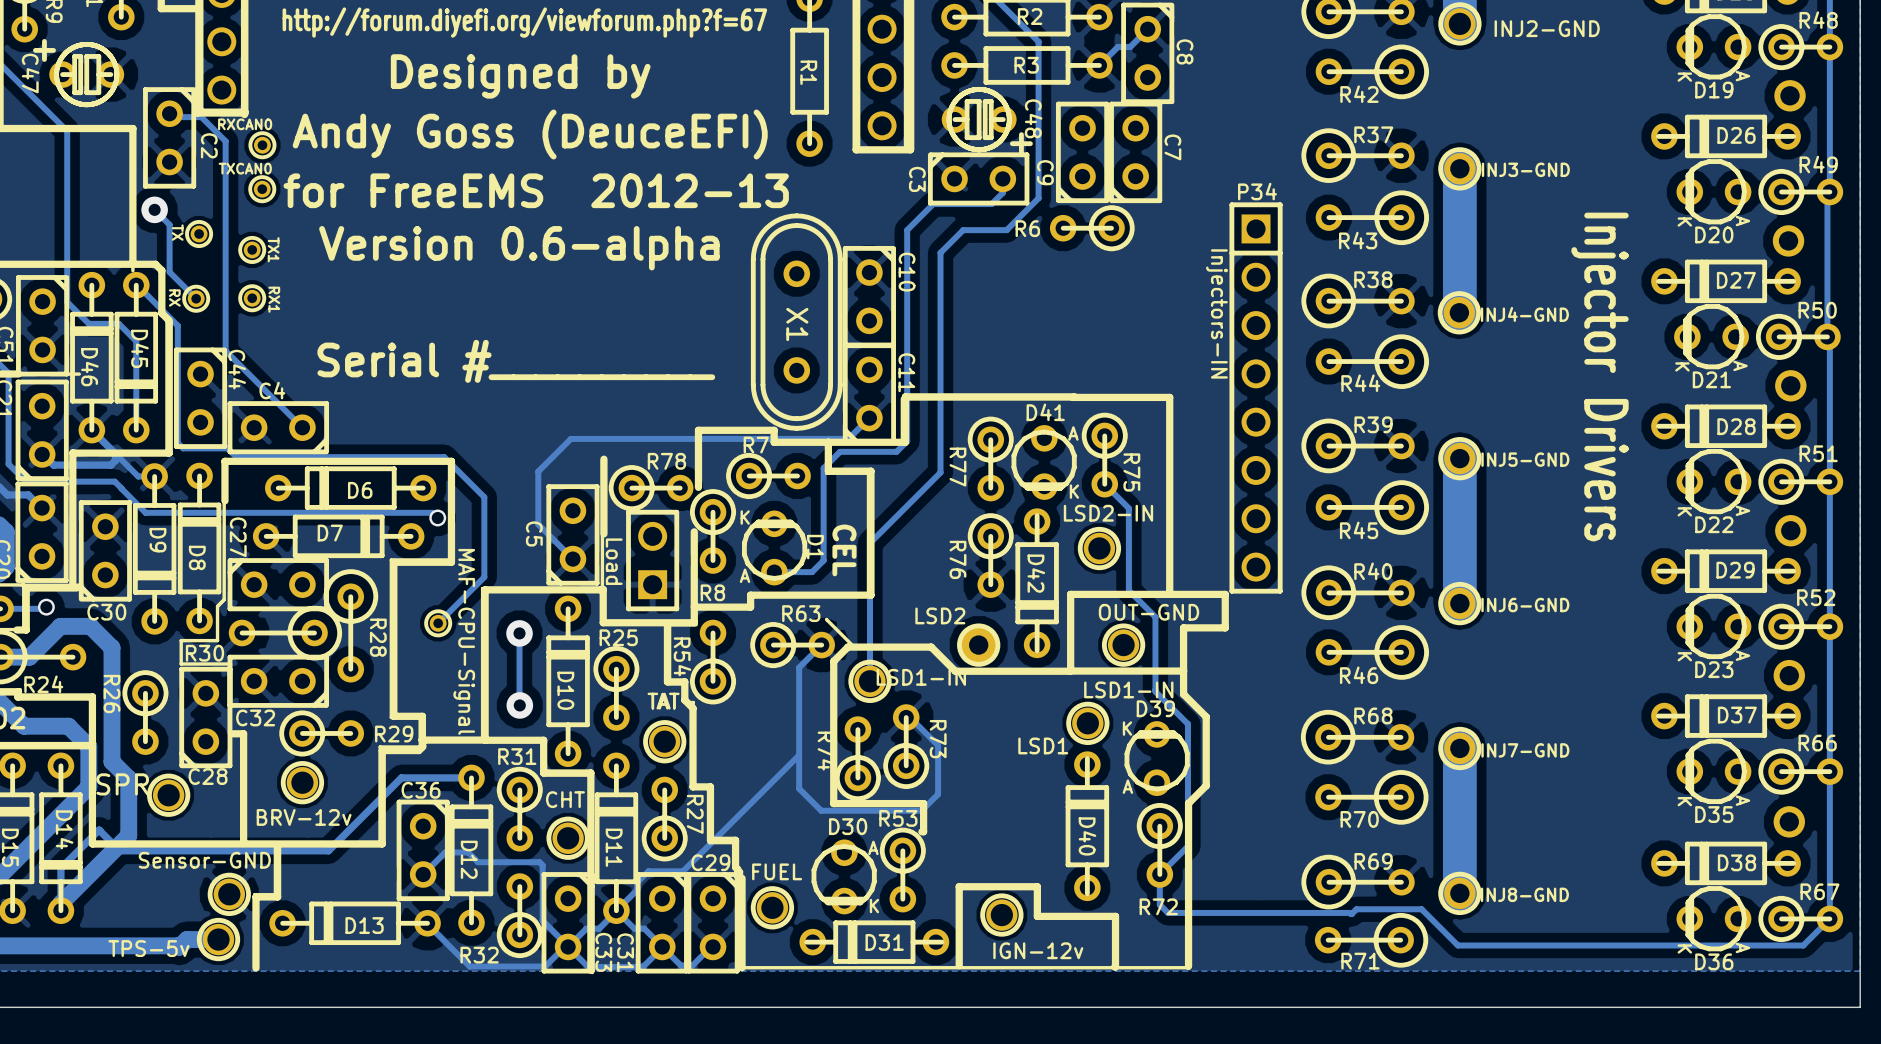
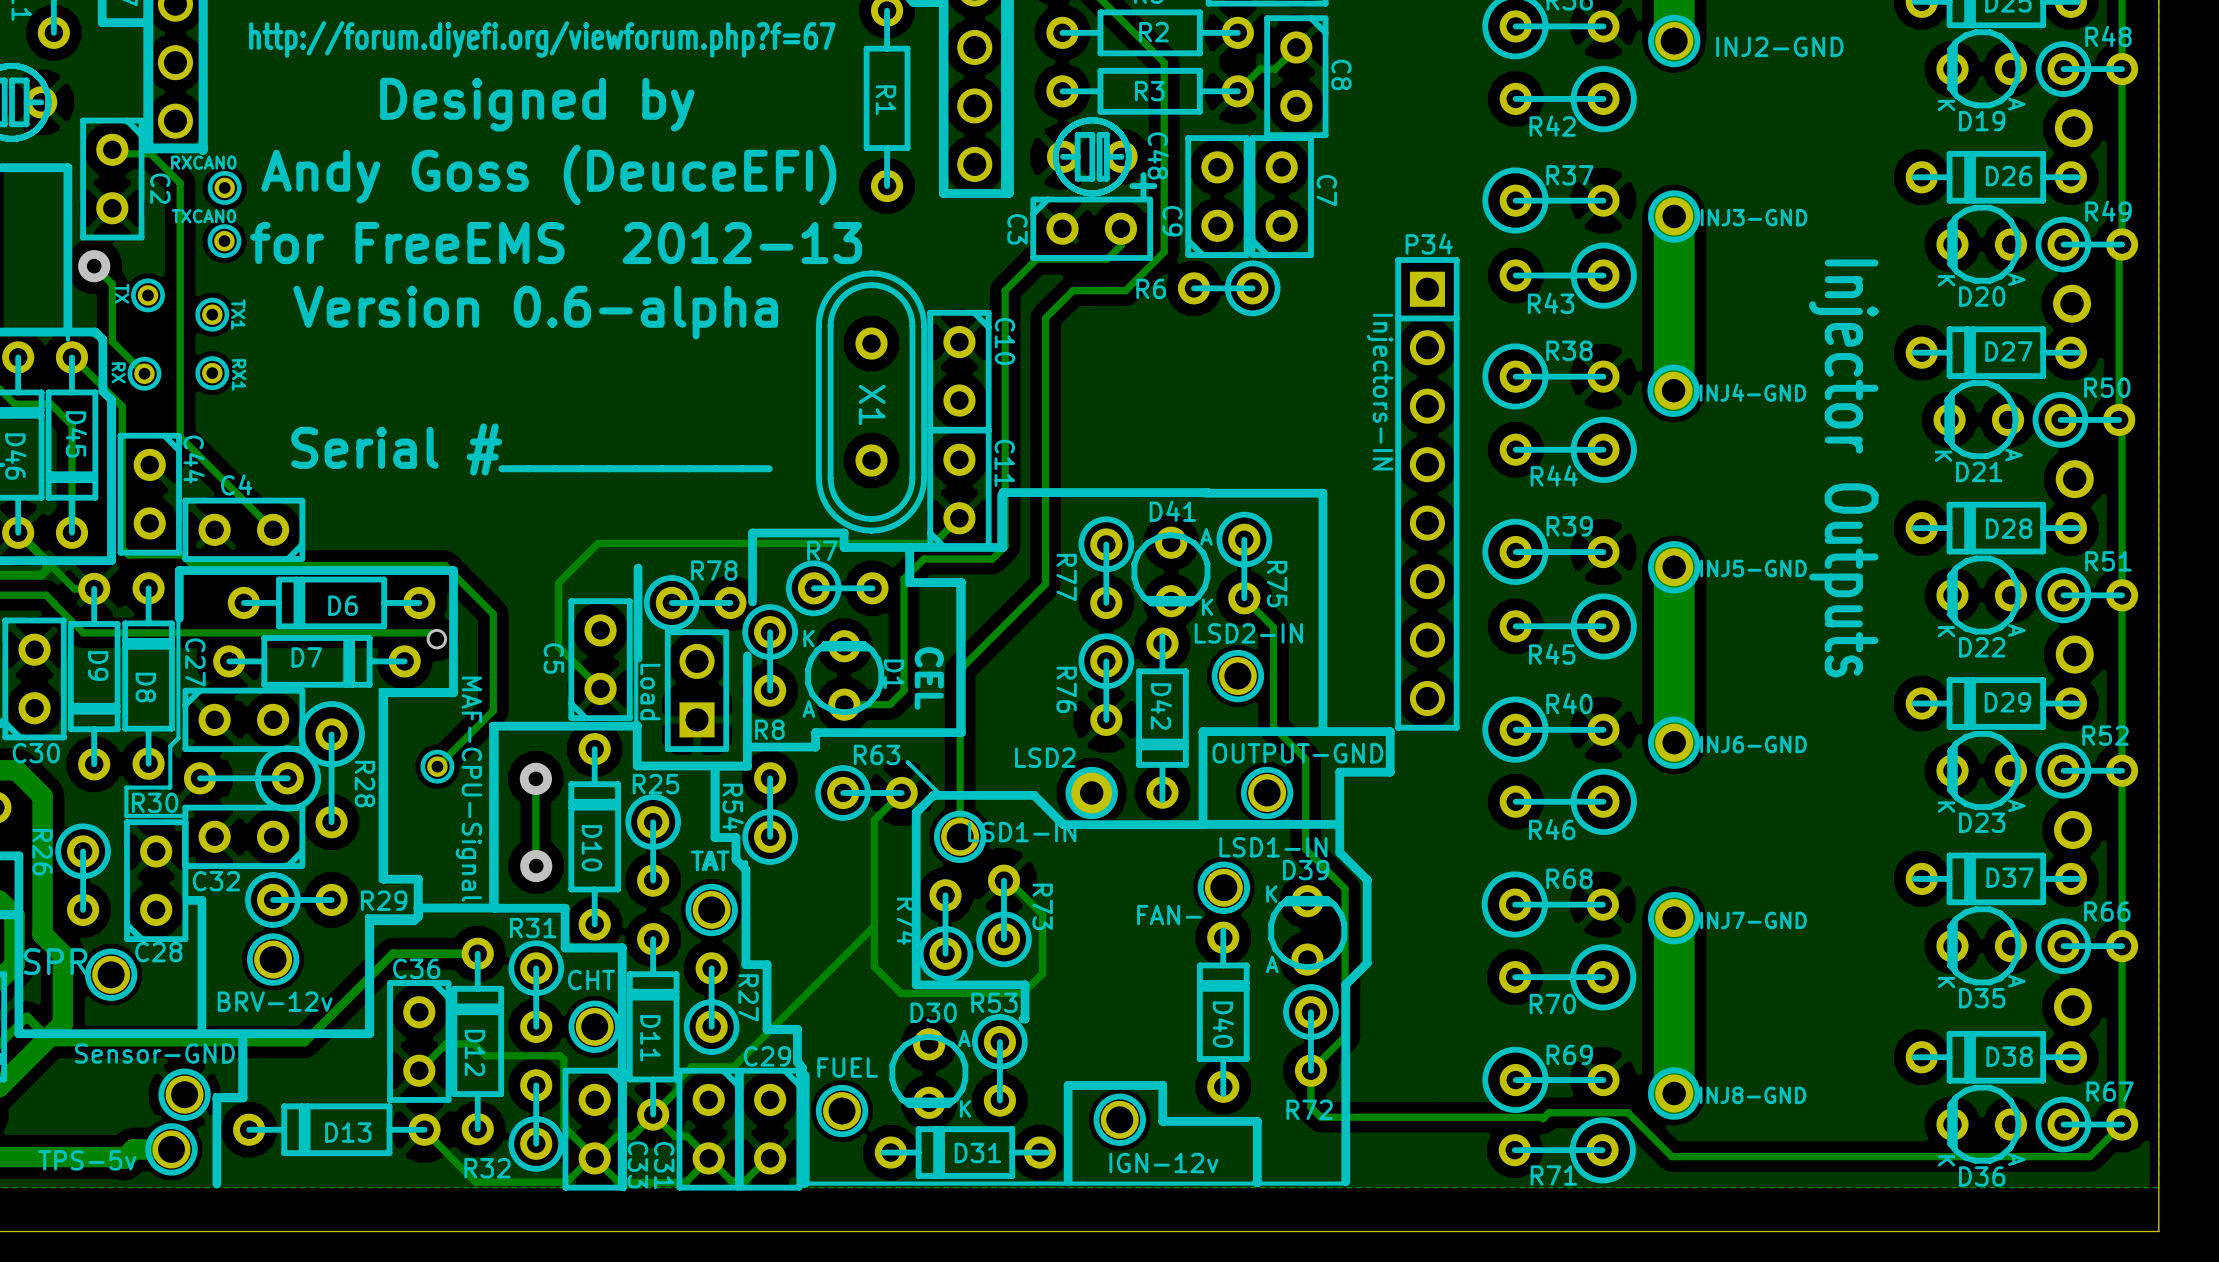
text: Injector Drivers (1600, 377) -> Injector Outputs (1843, 468)
part value: OUT-GND (1148, 612) -> OUTPUT-GND (1297, 753)
part value: LSD1 (1043, 745) -> FAN- (1169, 915)

